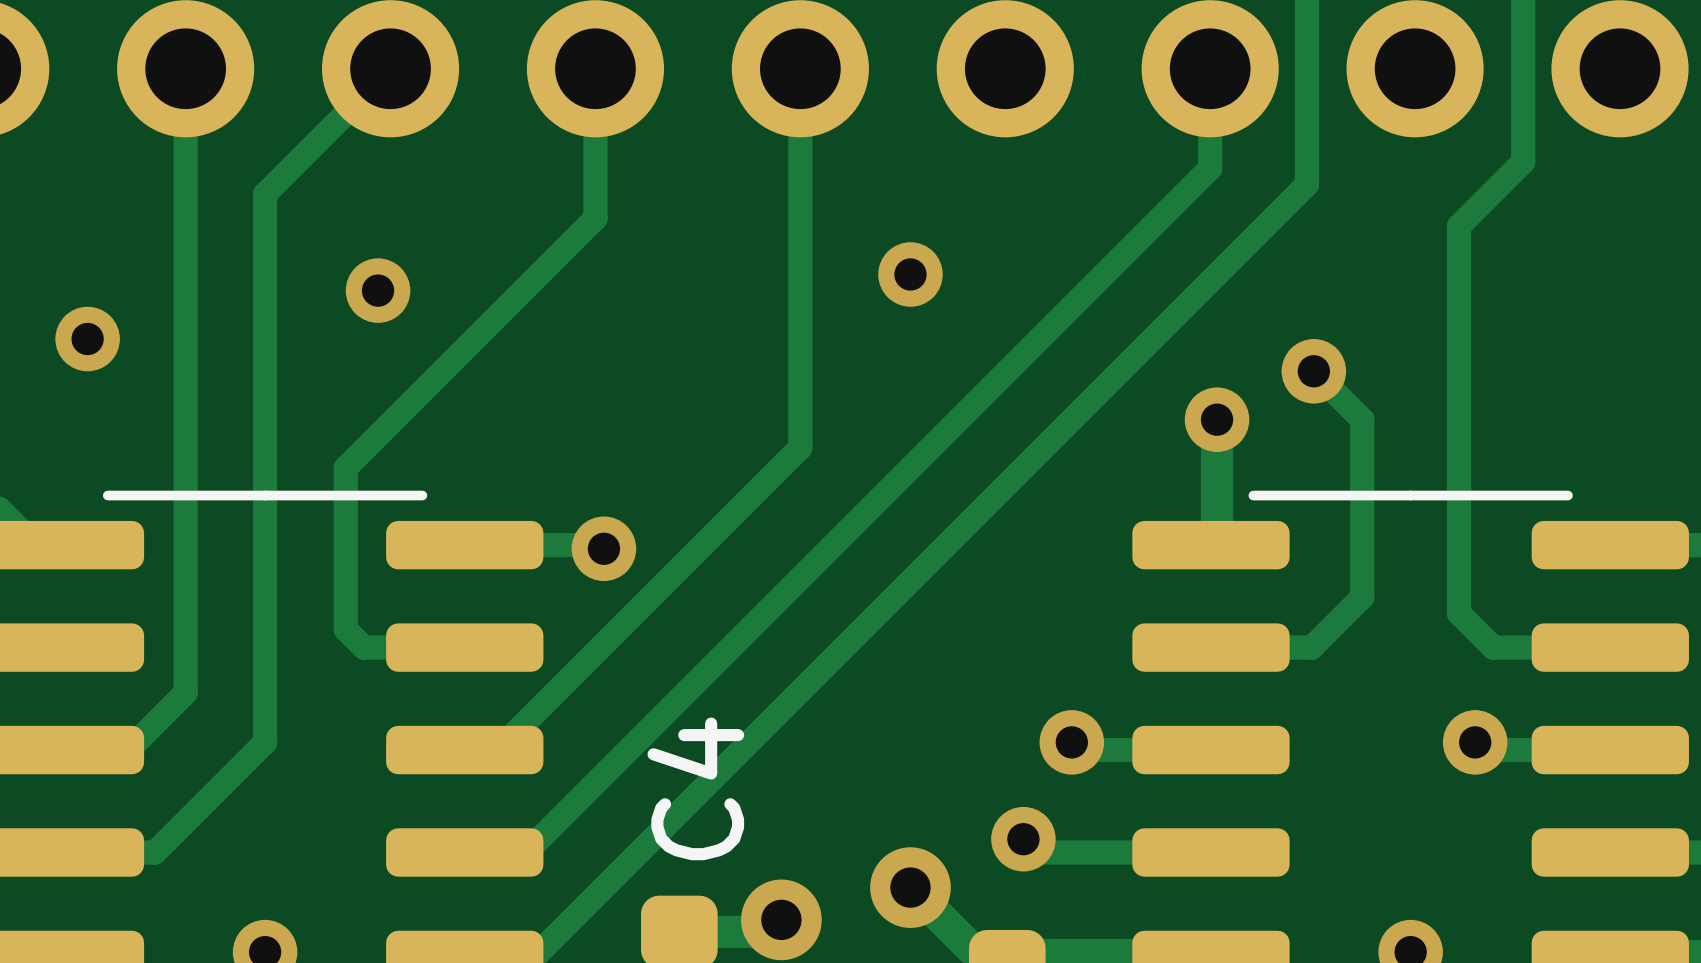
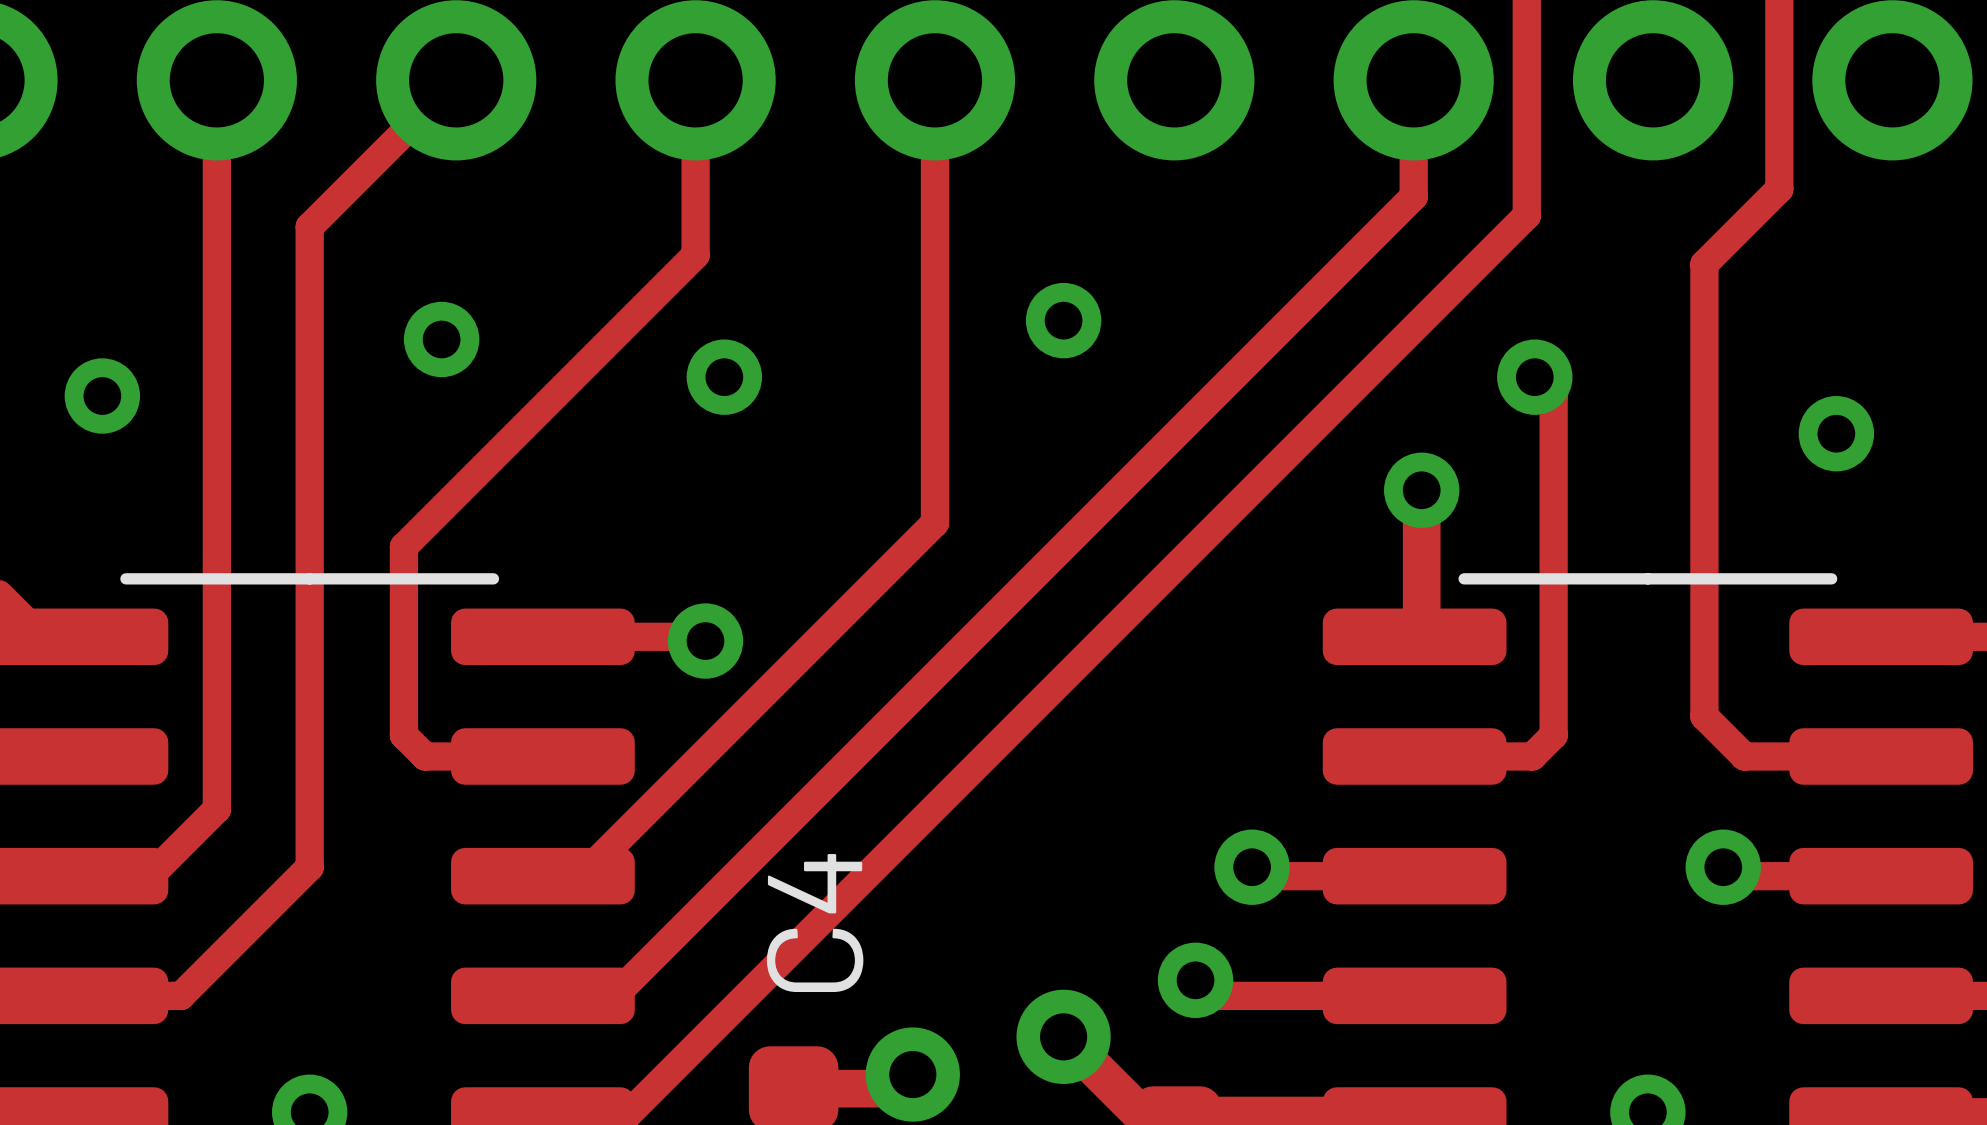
via: none -> (724, 377)
track: (1313, 371) (1362, 419) (1362, 597) (1329, 629) -> (1534, 377) (1553, 396) (1553, 735)
via position: (1313, 371) -> (1534, 377)
via: none -> (1836, 433)

